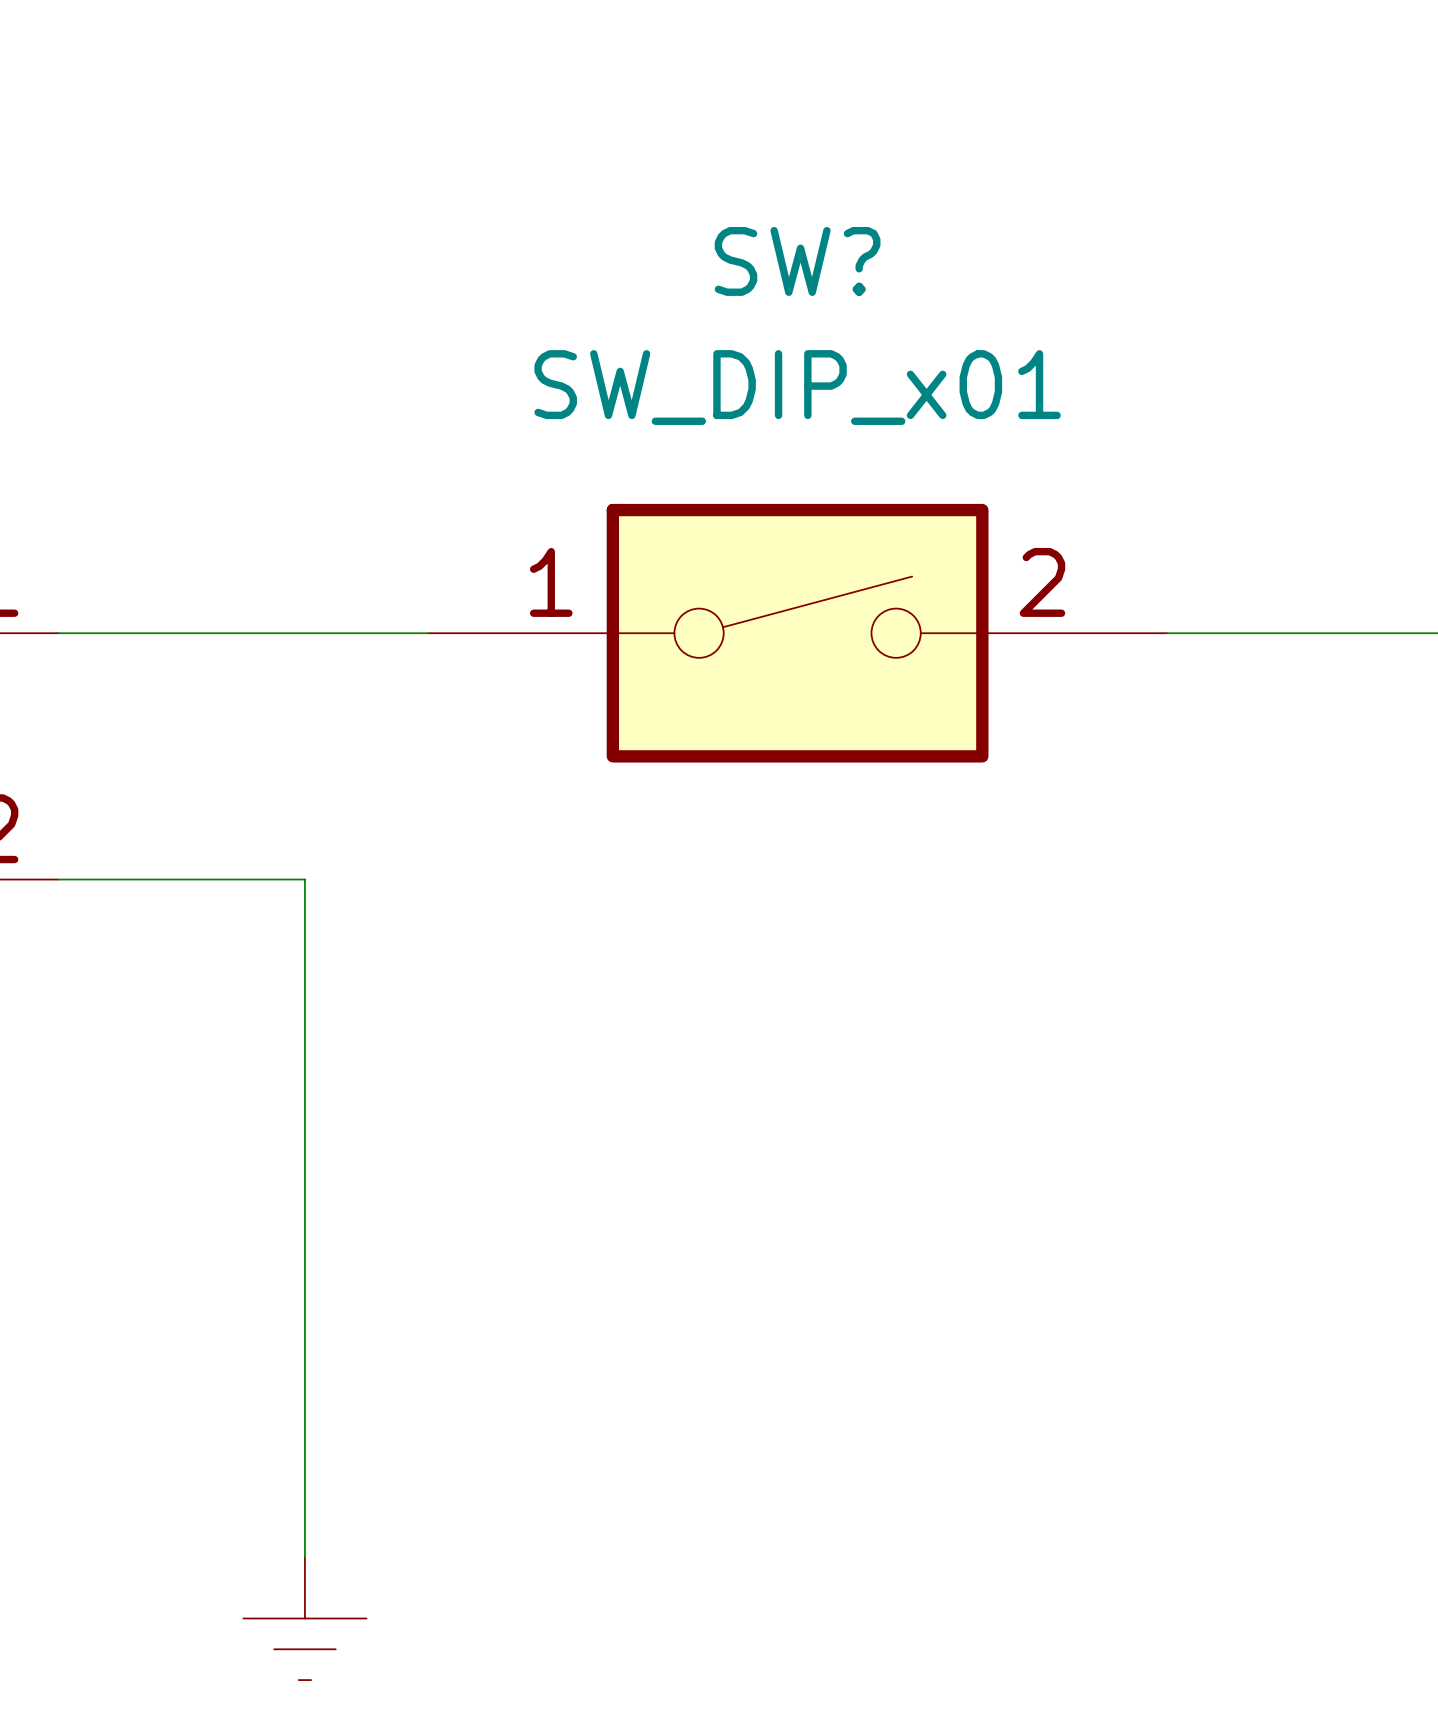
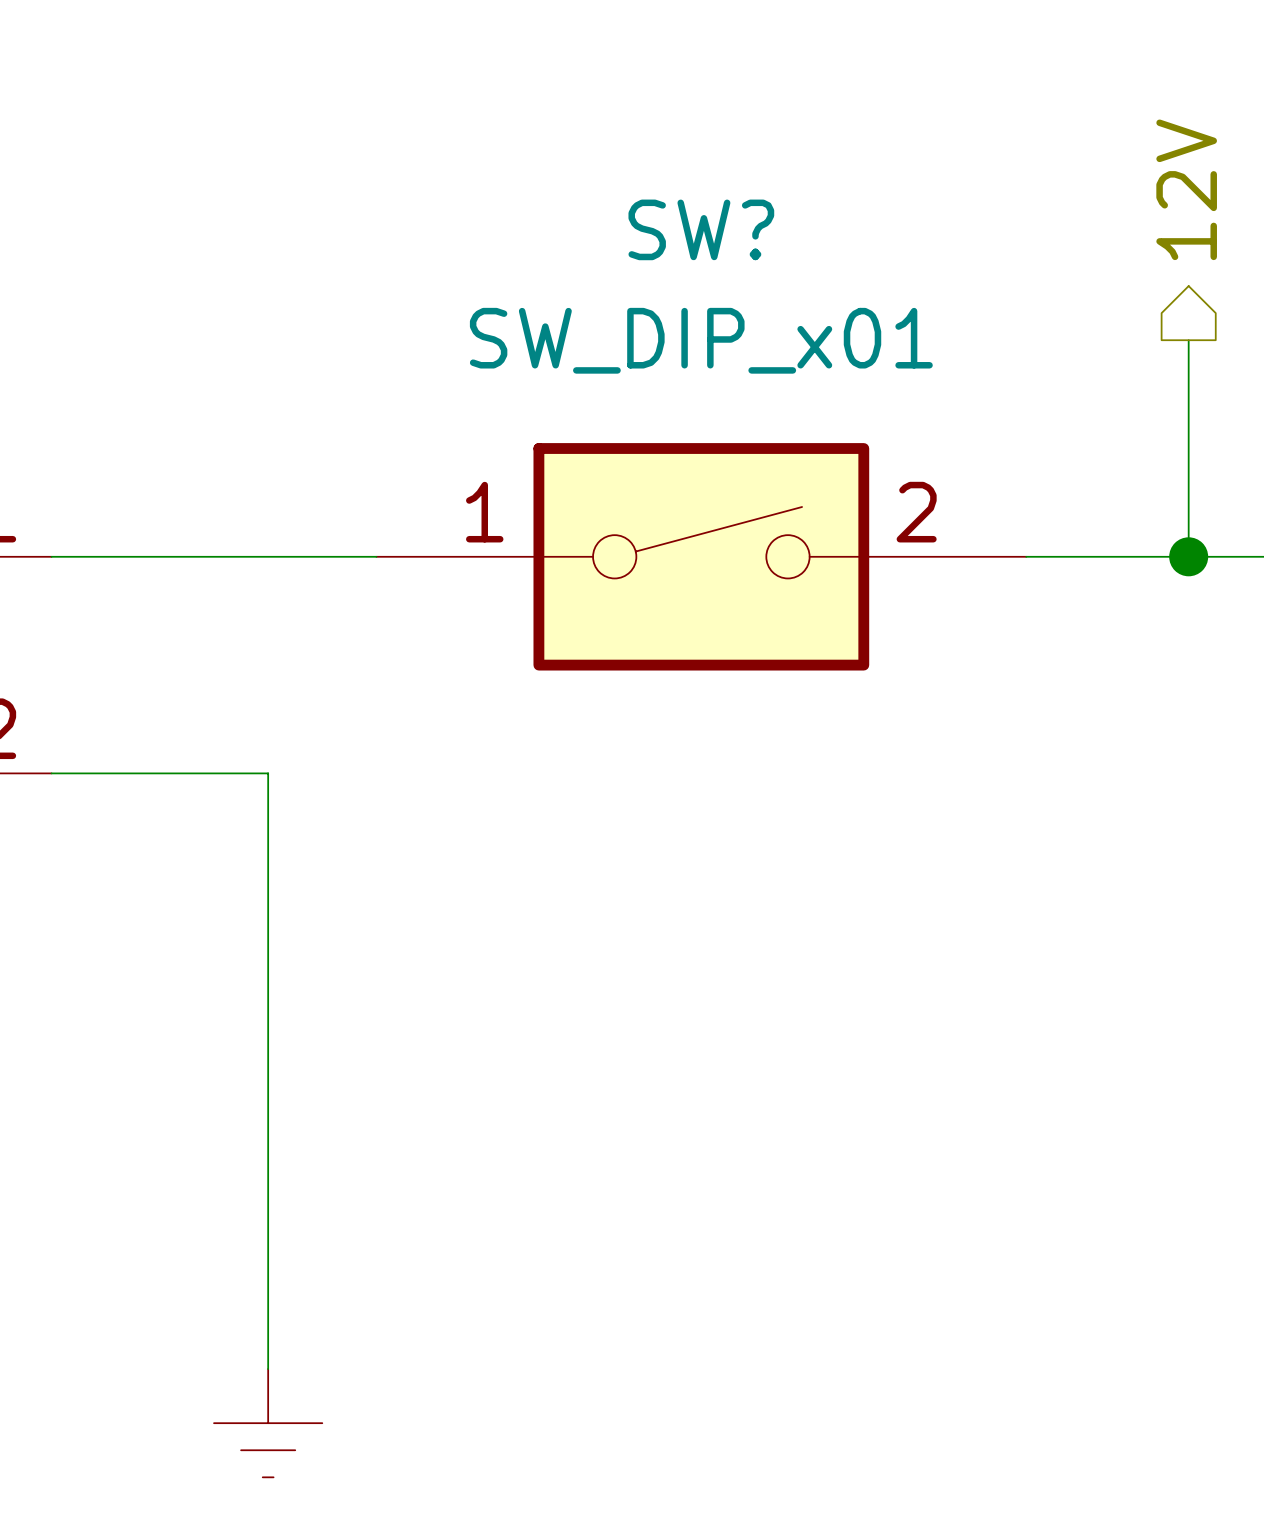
hierarchical label: none -> 12V (1186, 189)
wire: none -> (1188, 340) (1188, 556)
junction: none -> (1188, 556)

